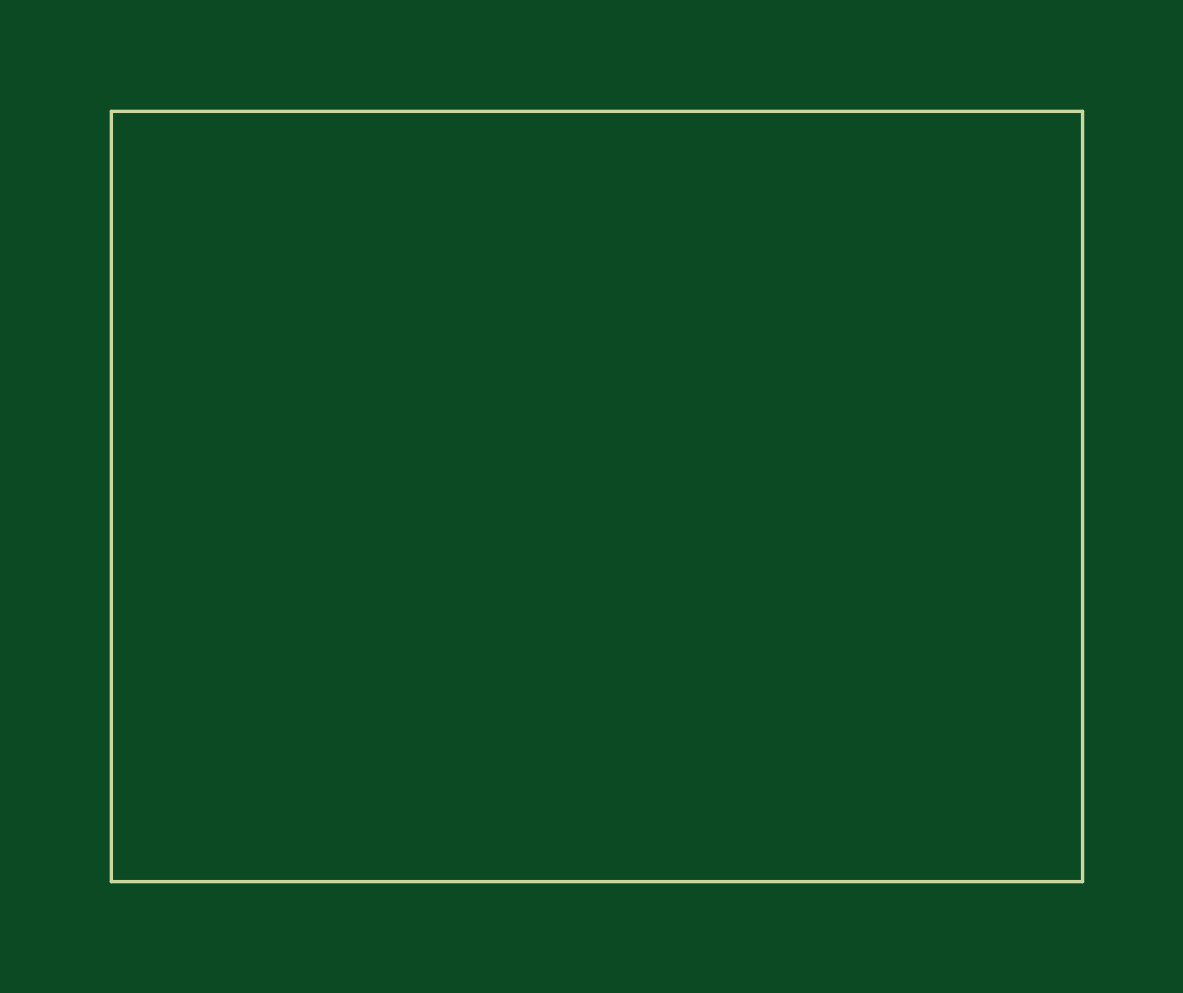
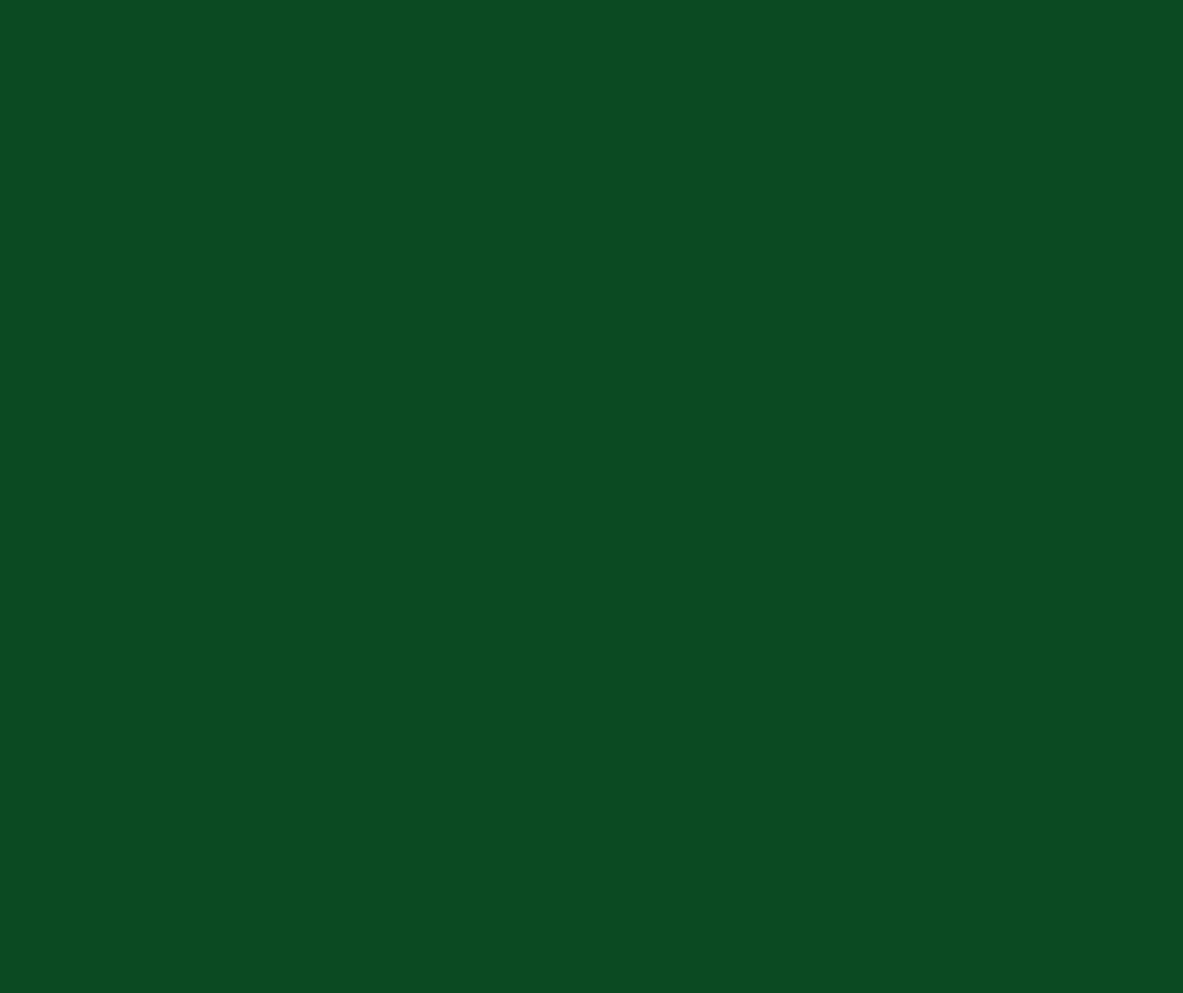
board edge: (1082, 111) (1082, 881) (111, 881) (111, 111) (1082, 111) -> none

